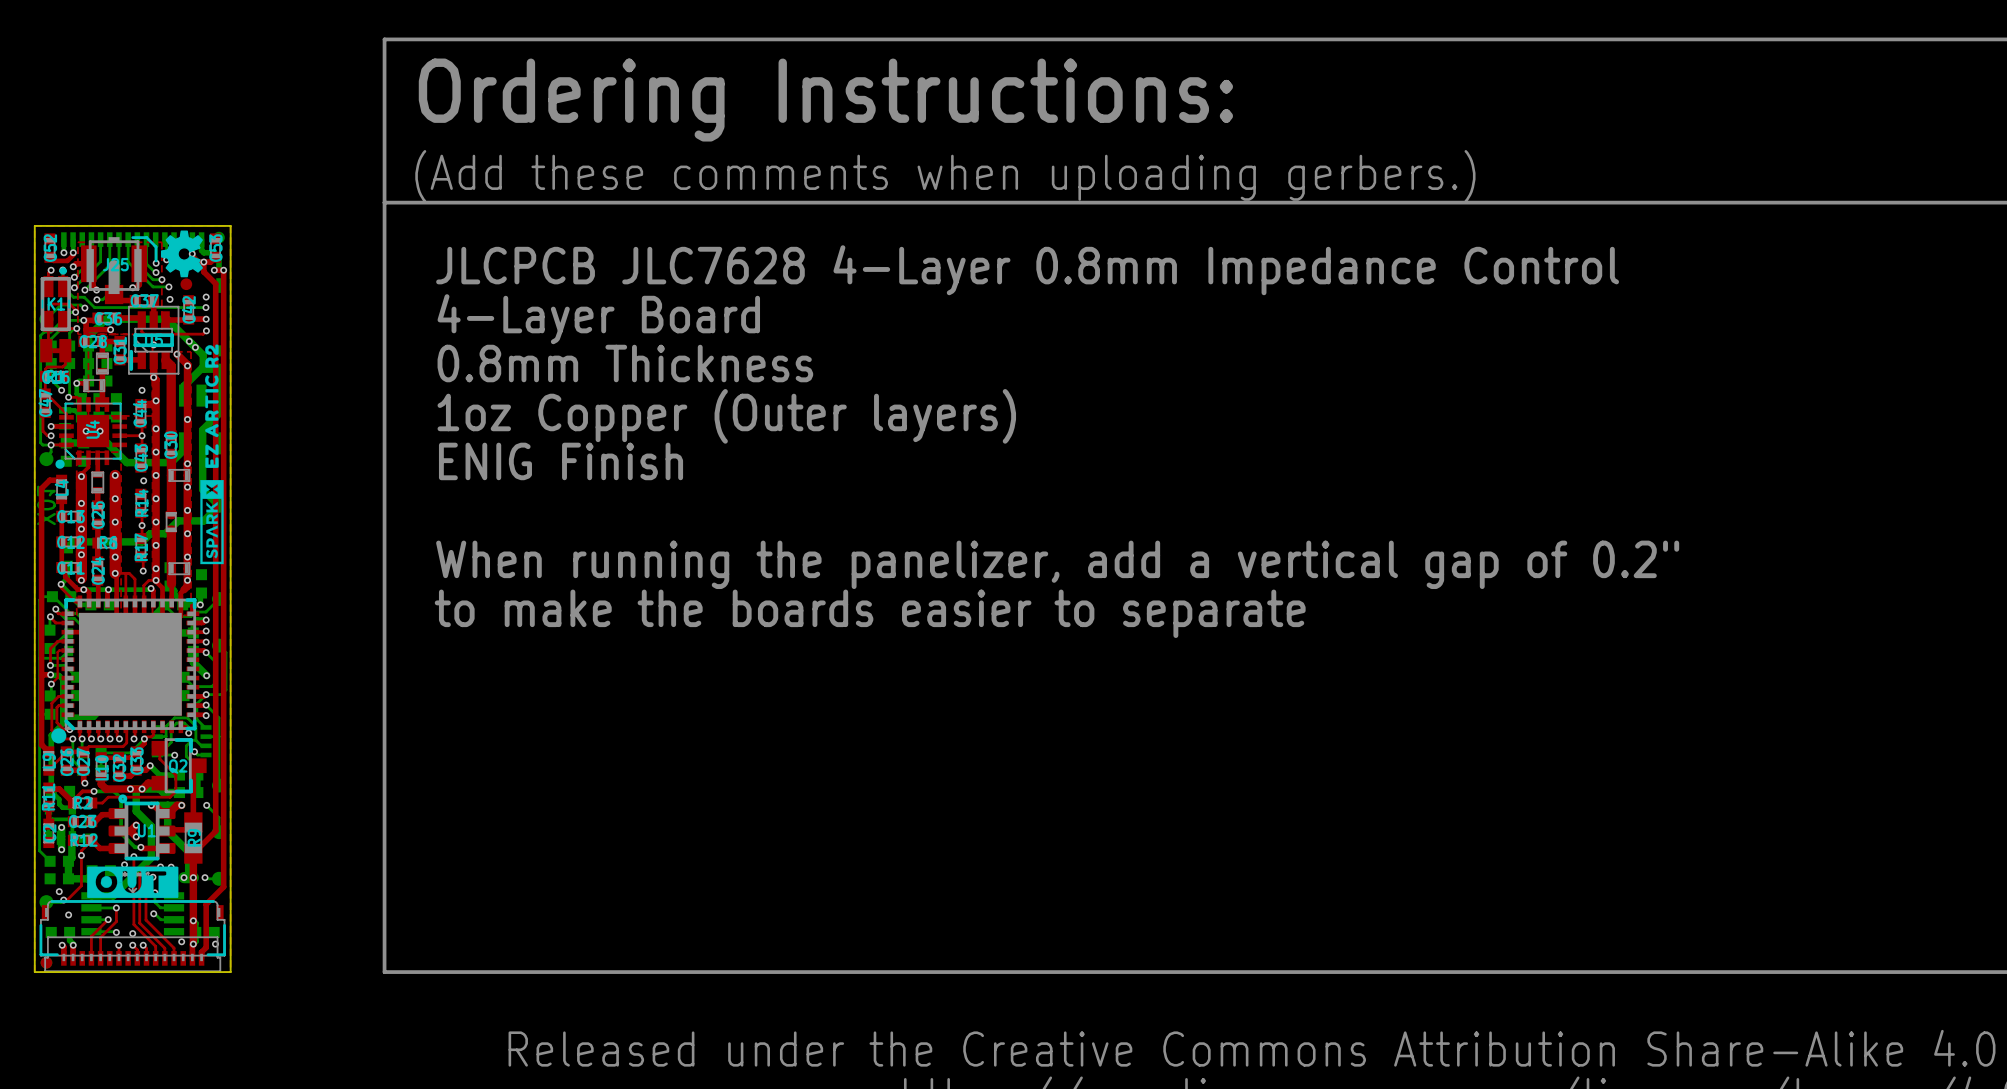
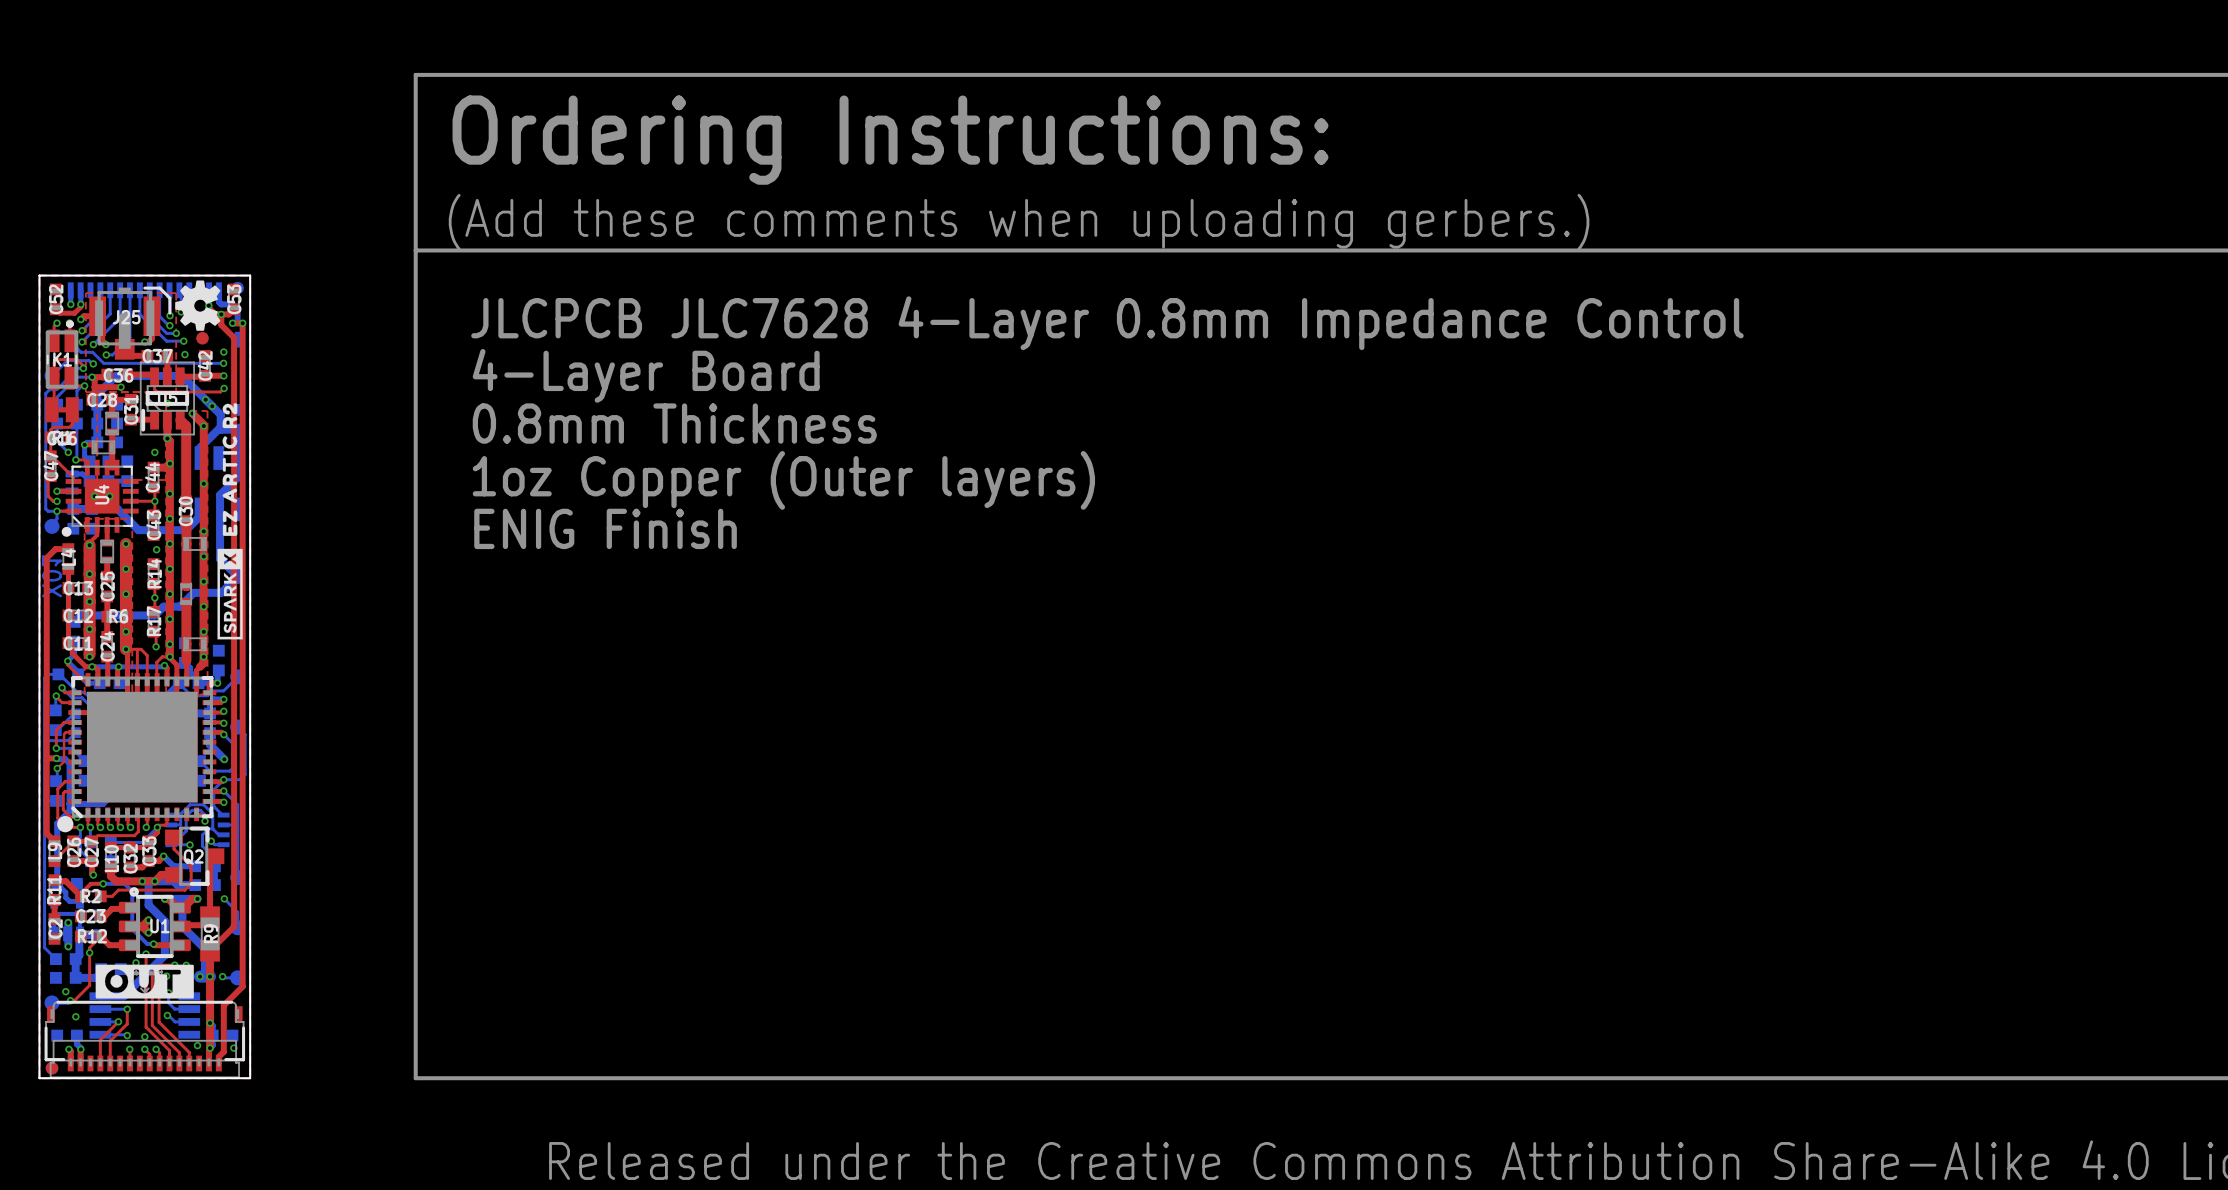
text: When running the panelizer, add a vertical gap of 0.2" (1057, 564) -> none
text: to make the boards easier to separate (870, 613) -> none

